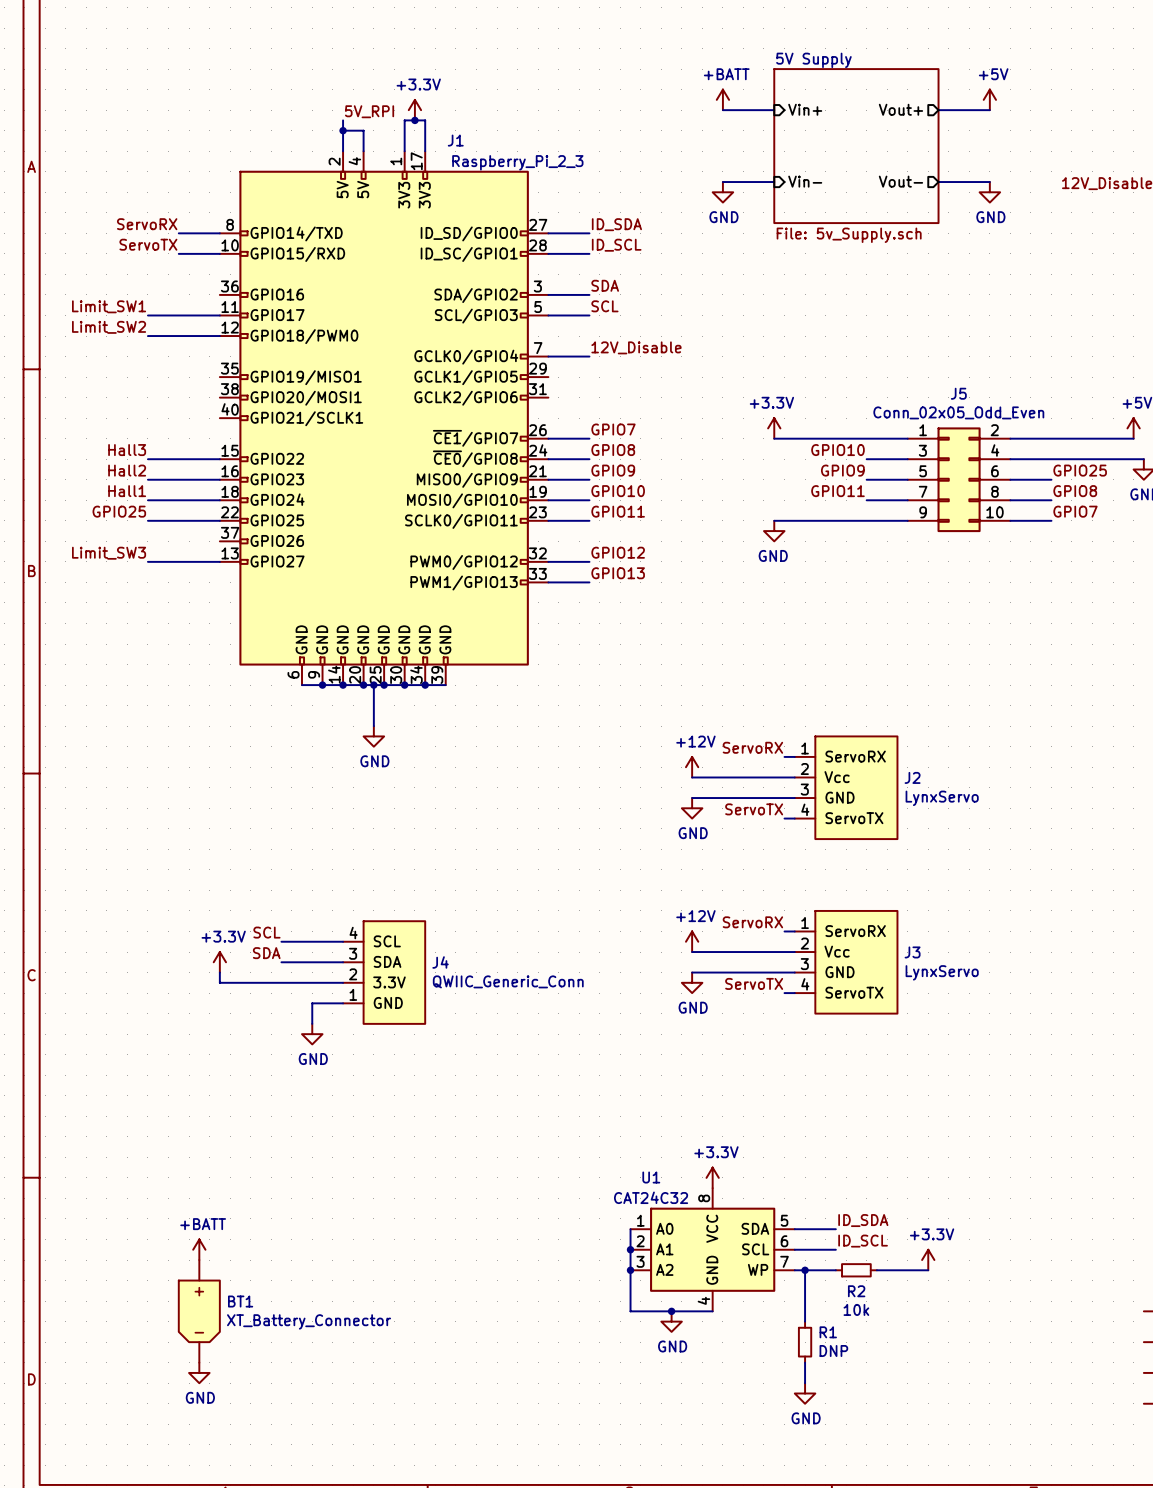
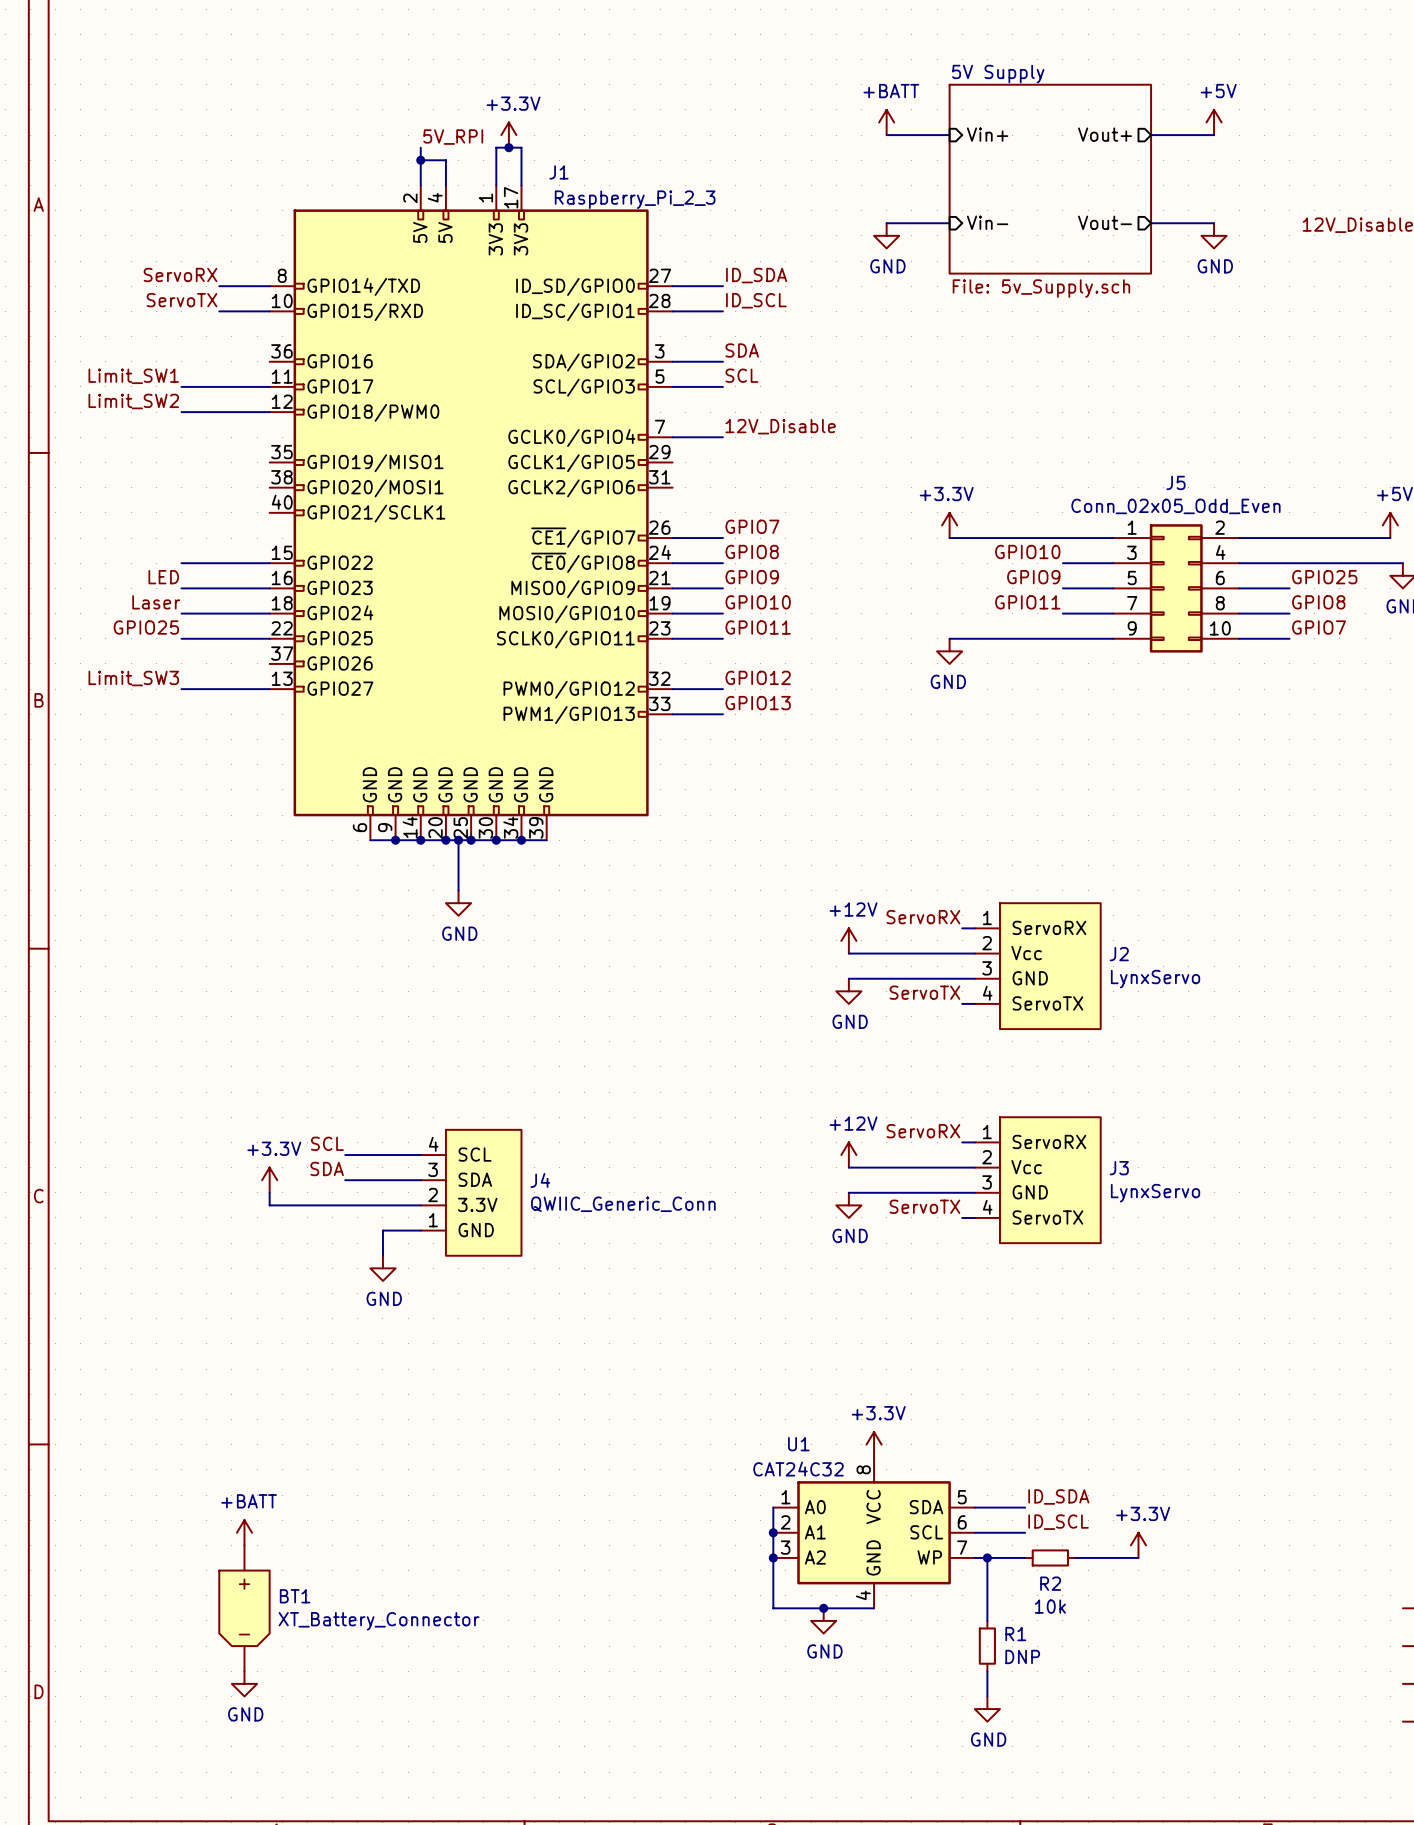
label: Hall3 (127, 450) -> none
label: Hall2 (127, 470) -> LED (163, 577)
label: Hall1 (127, 491) -> Laser (156, 602)

